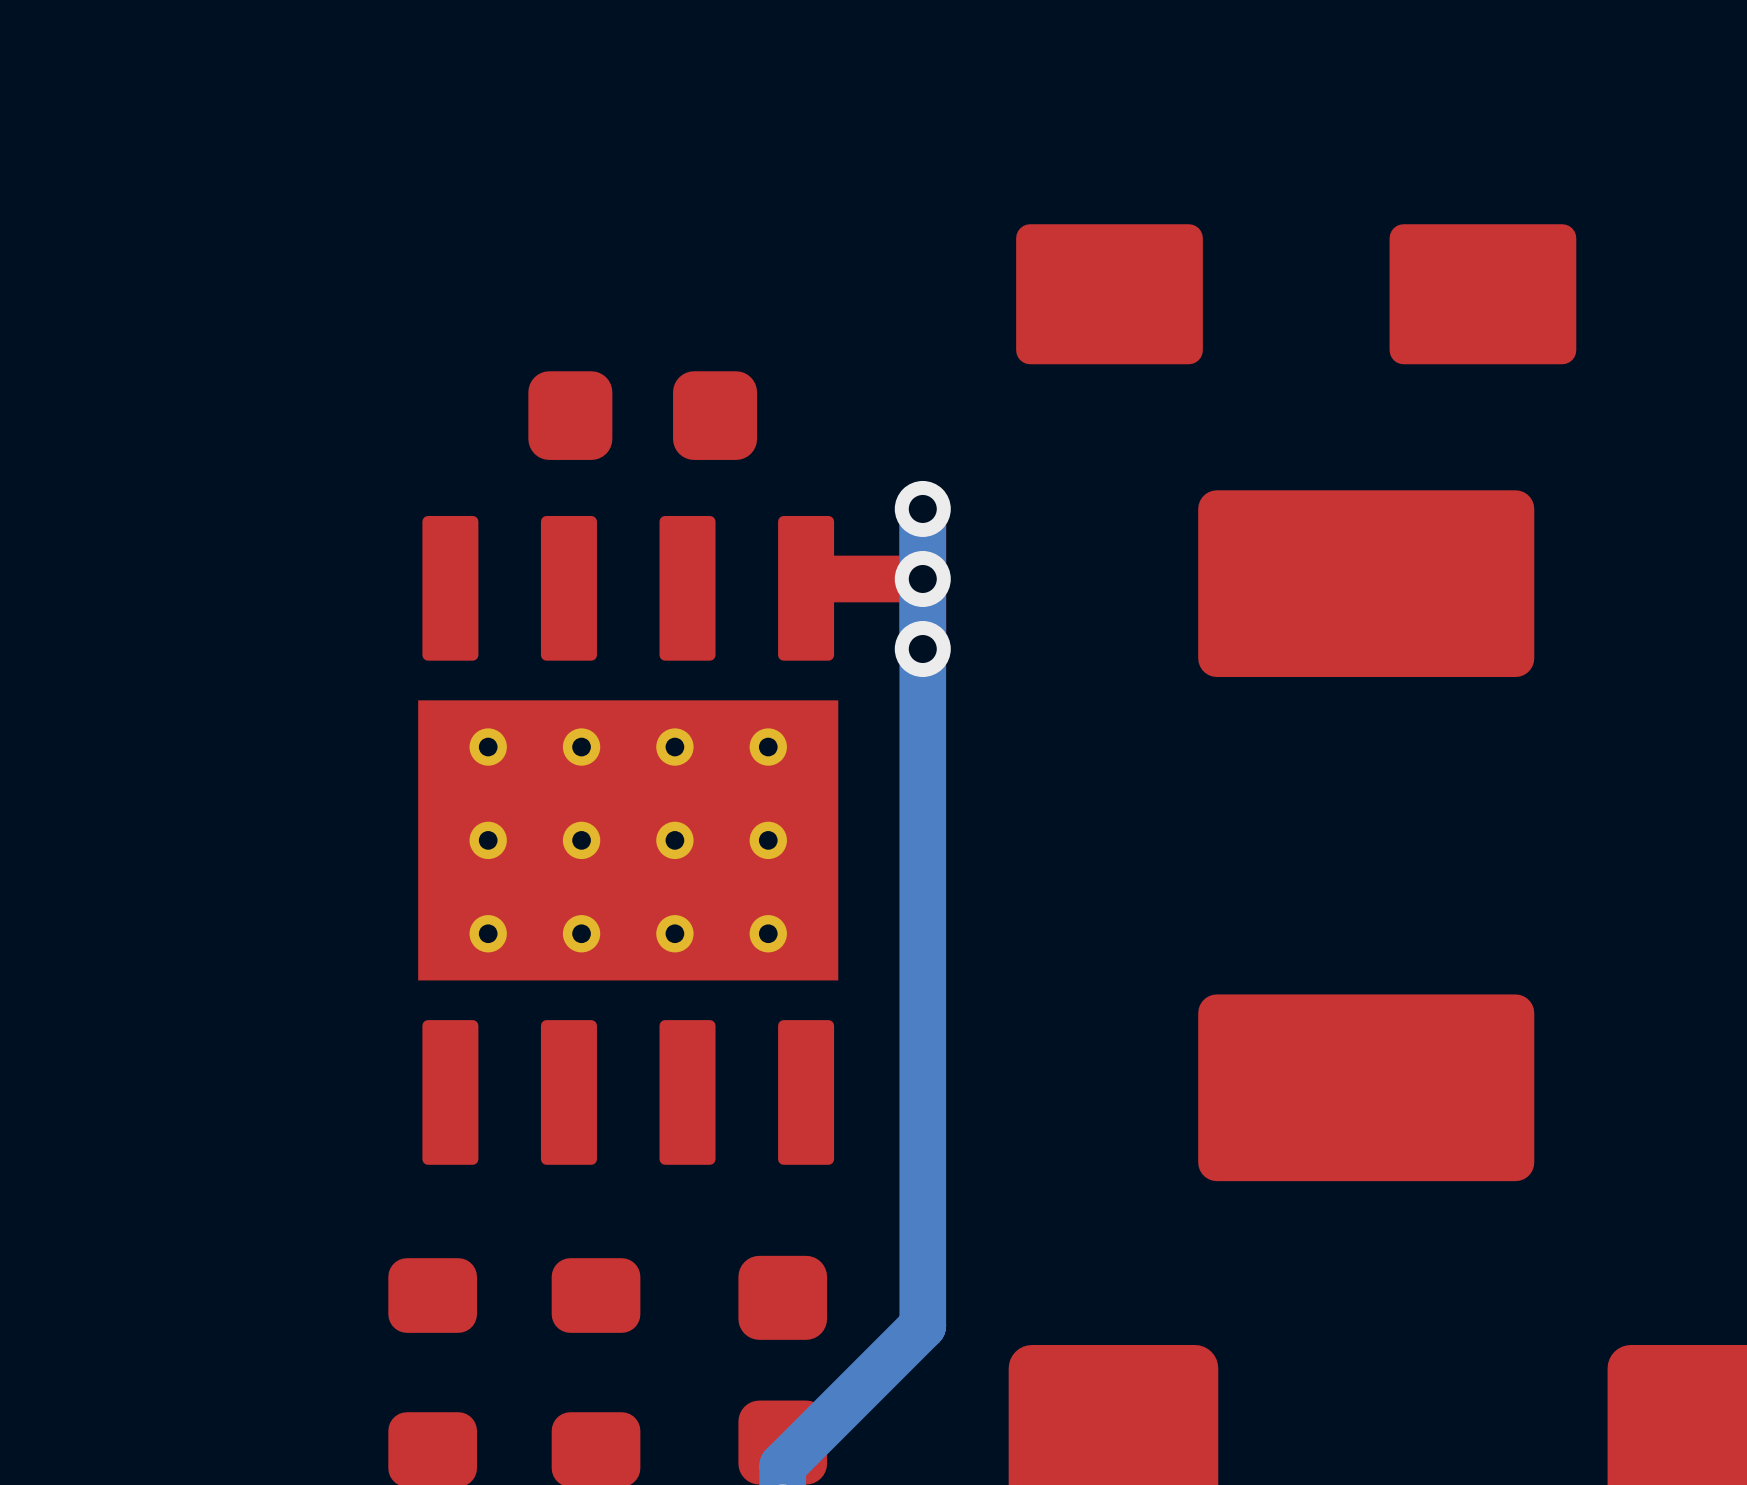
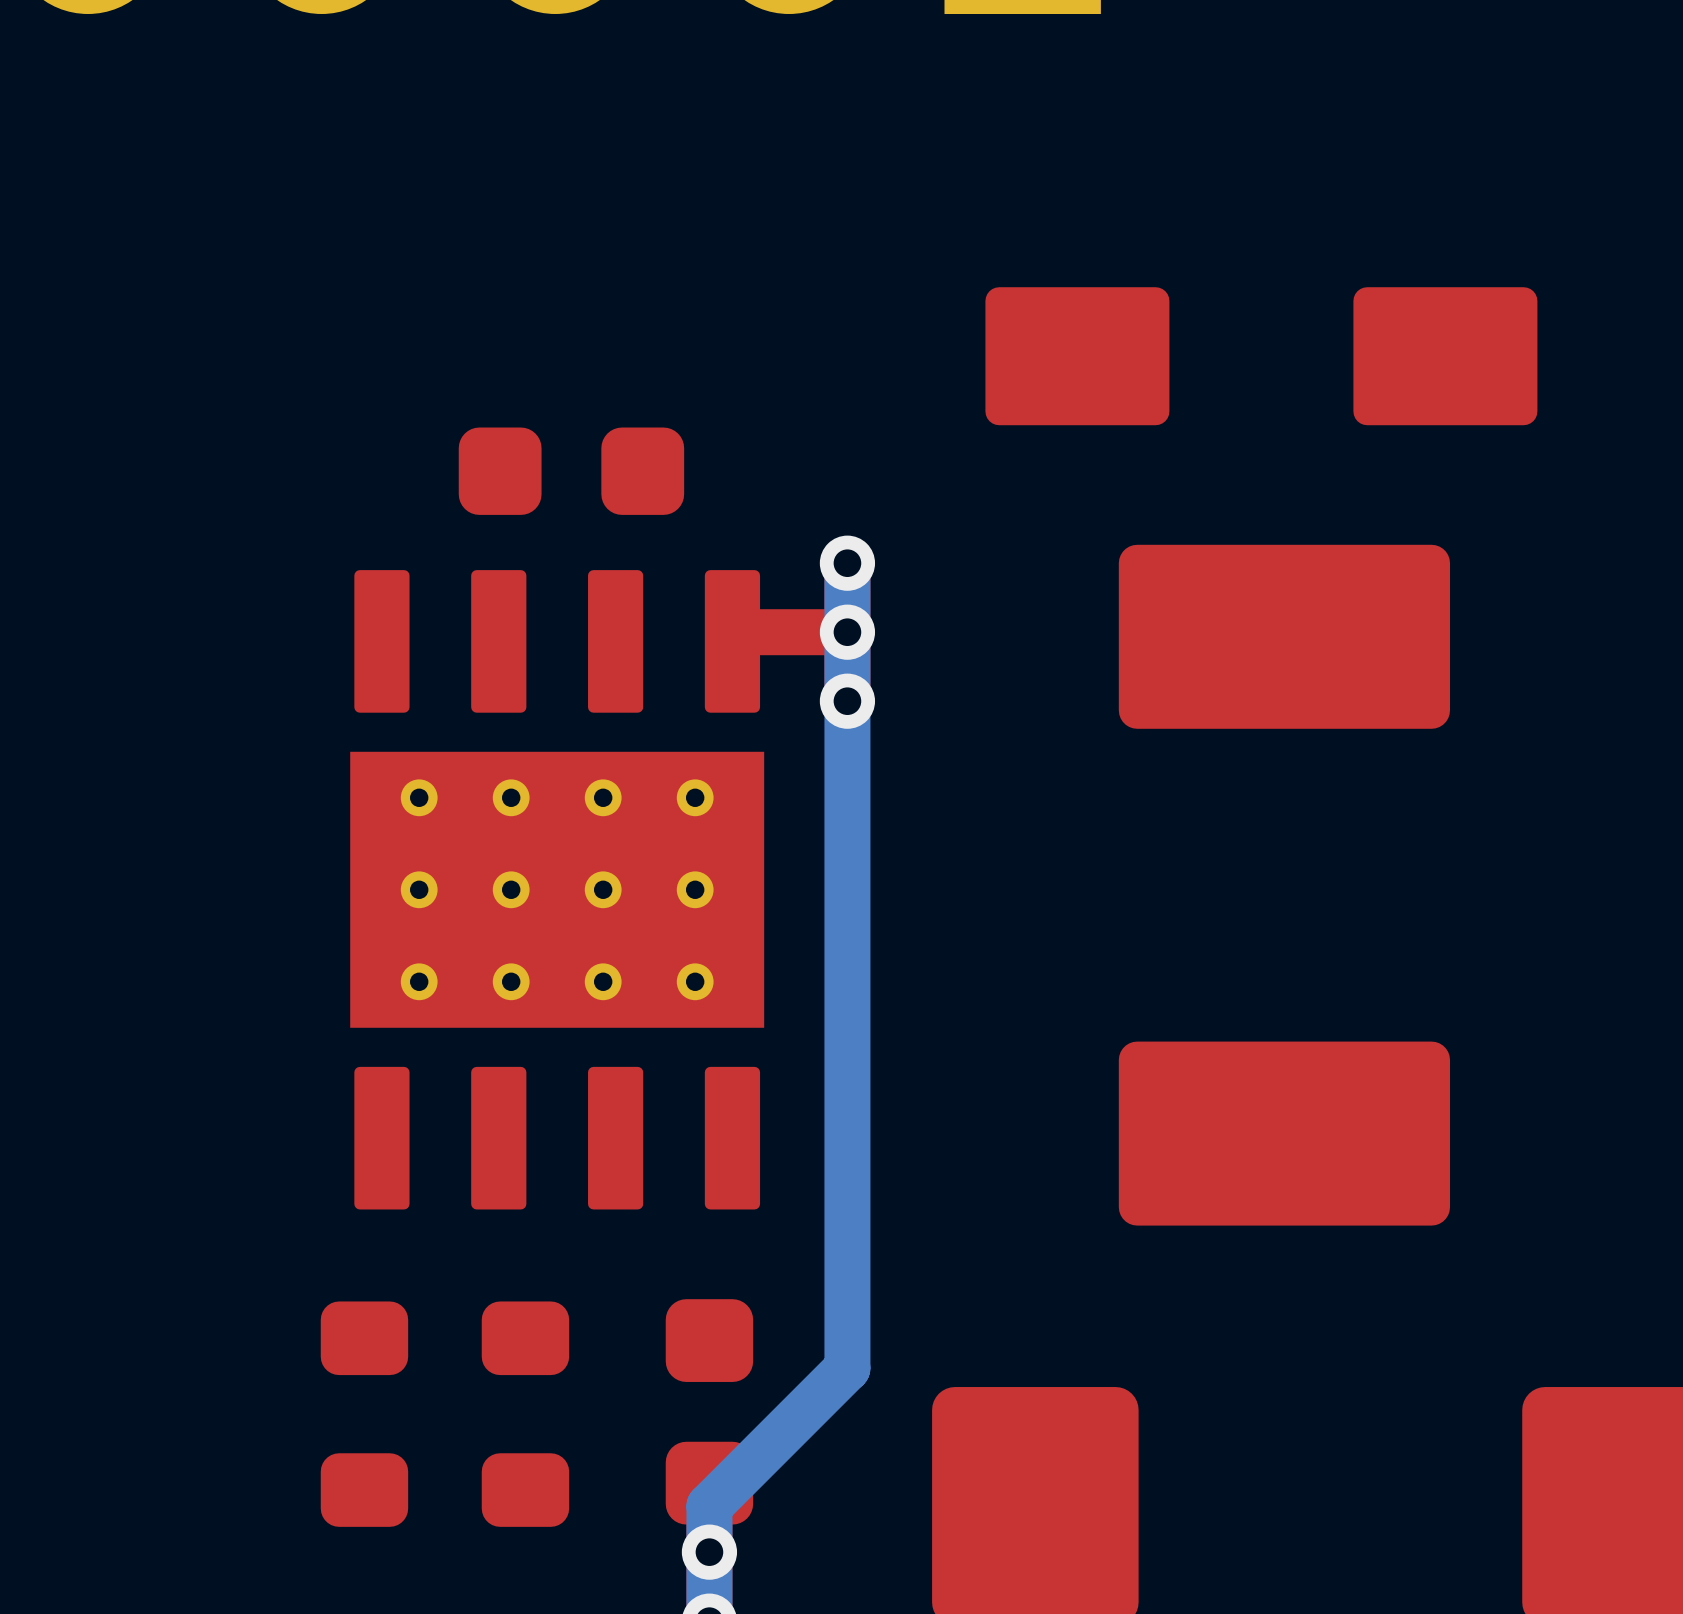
part position: (1296, 294) -> (1261, 356)

